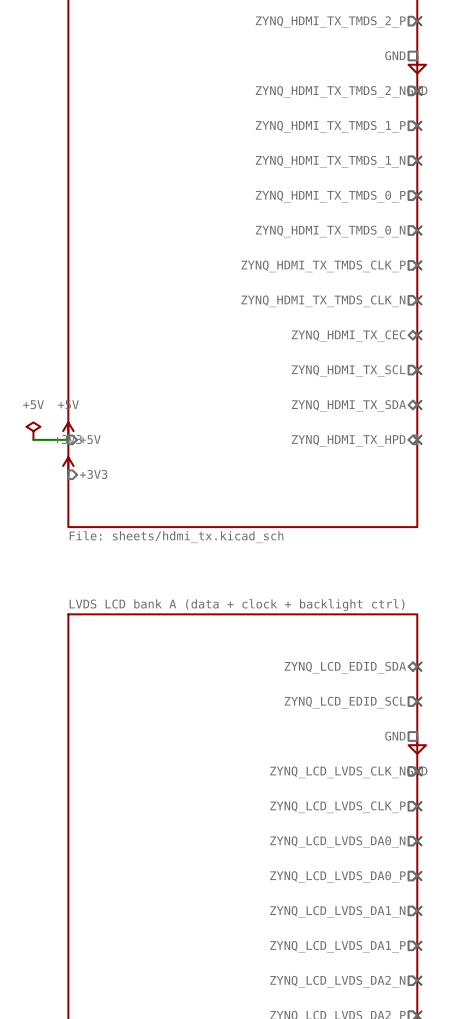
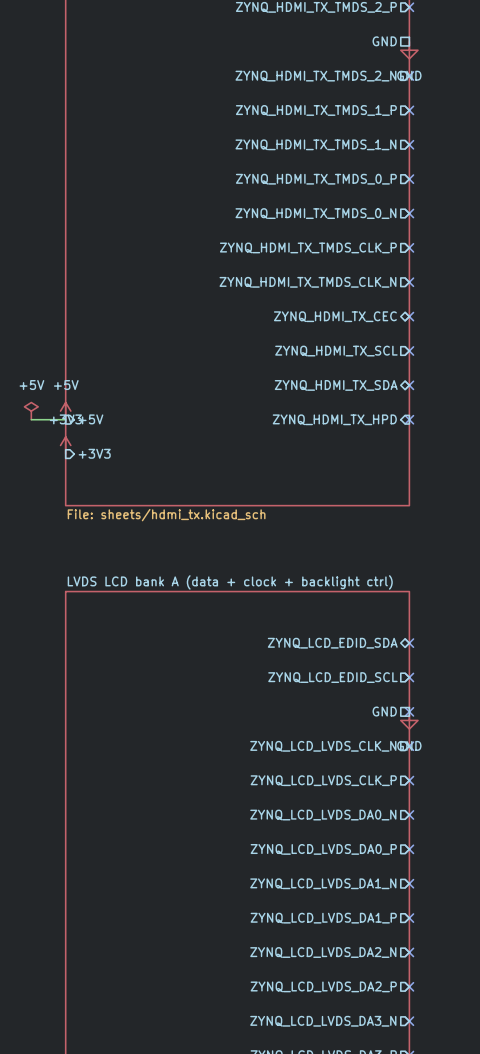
no-connect mark: none -> (409, 711)

